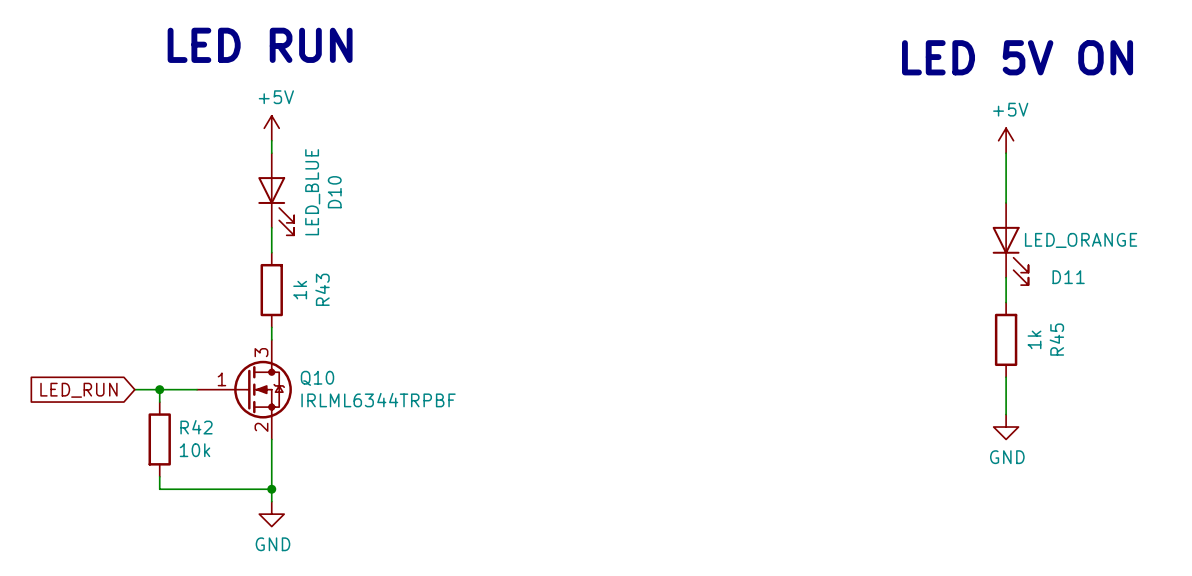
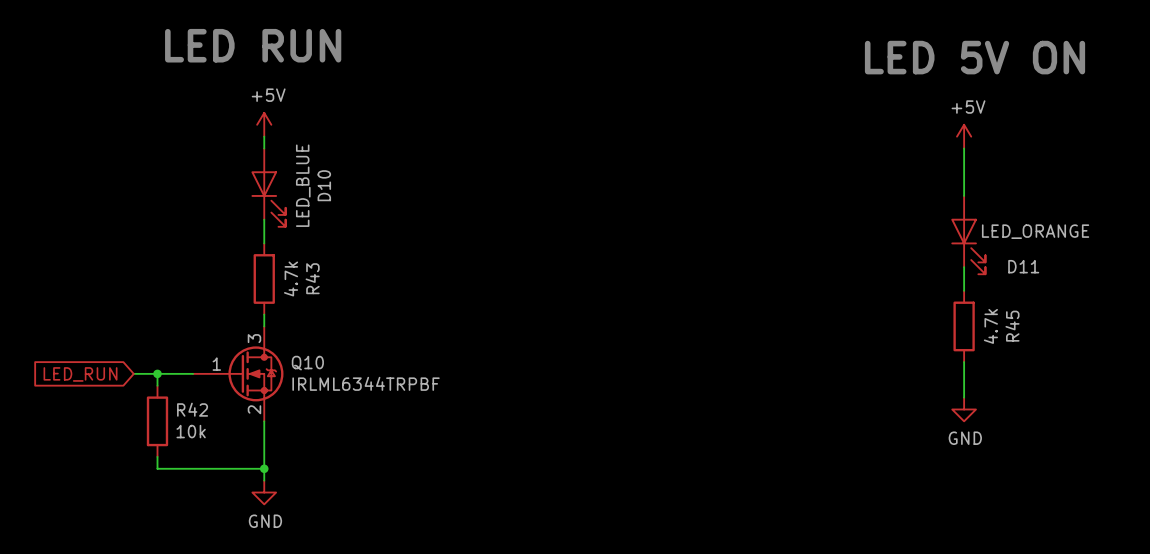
R43 value: 1k (300, 290) -> 4.7k (291, 278)
R45 value: 1k (1034, 339) -> 4.7k (990, 326)

